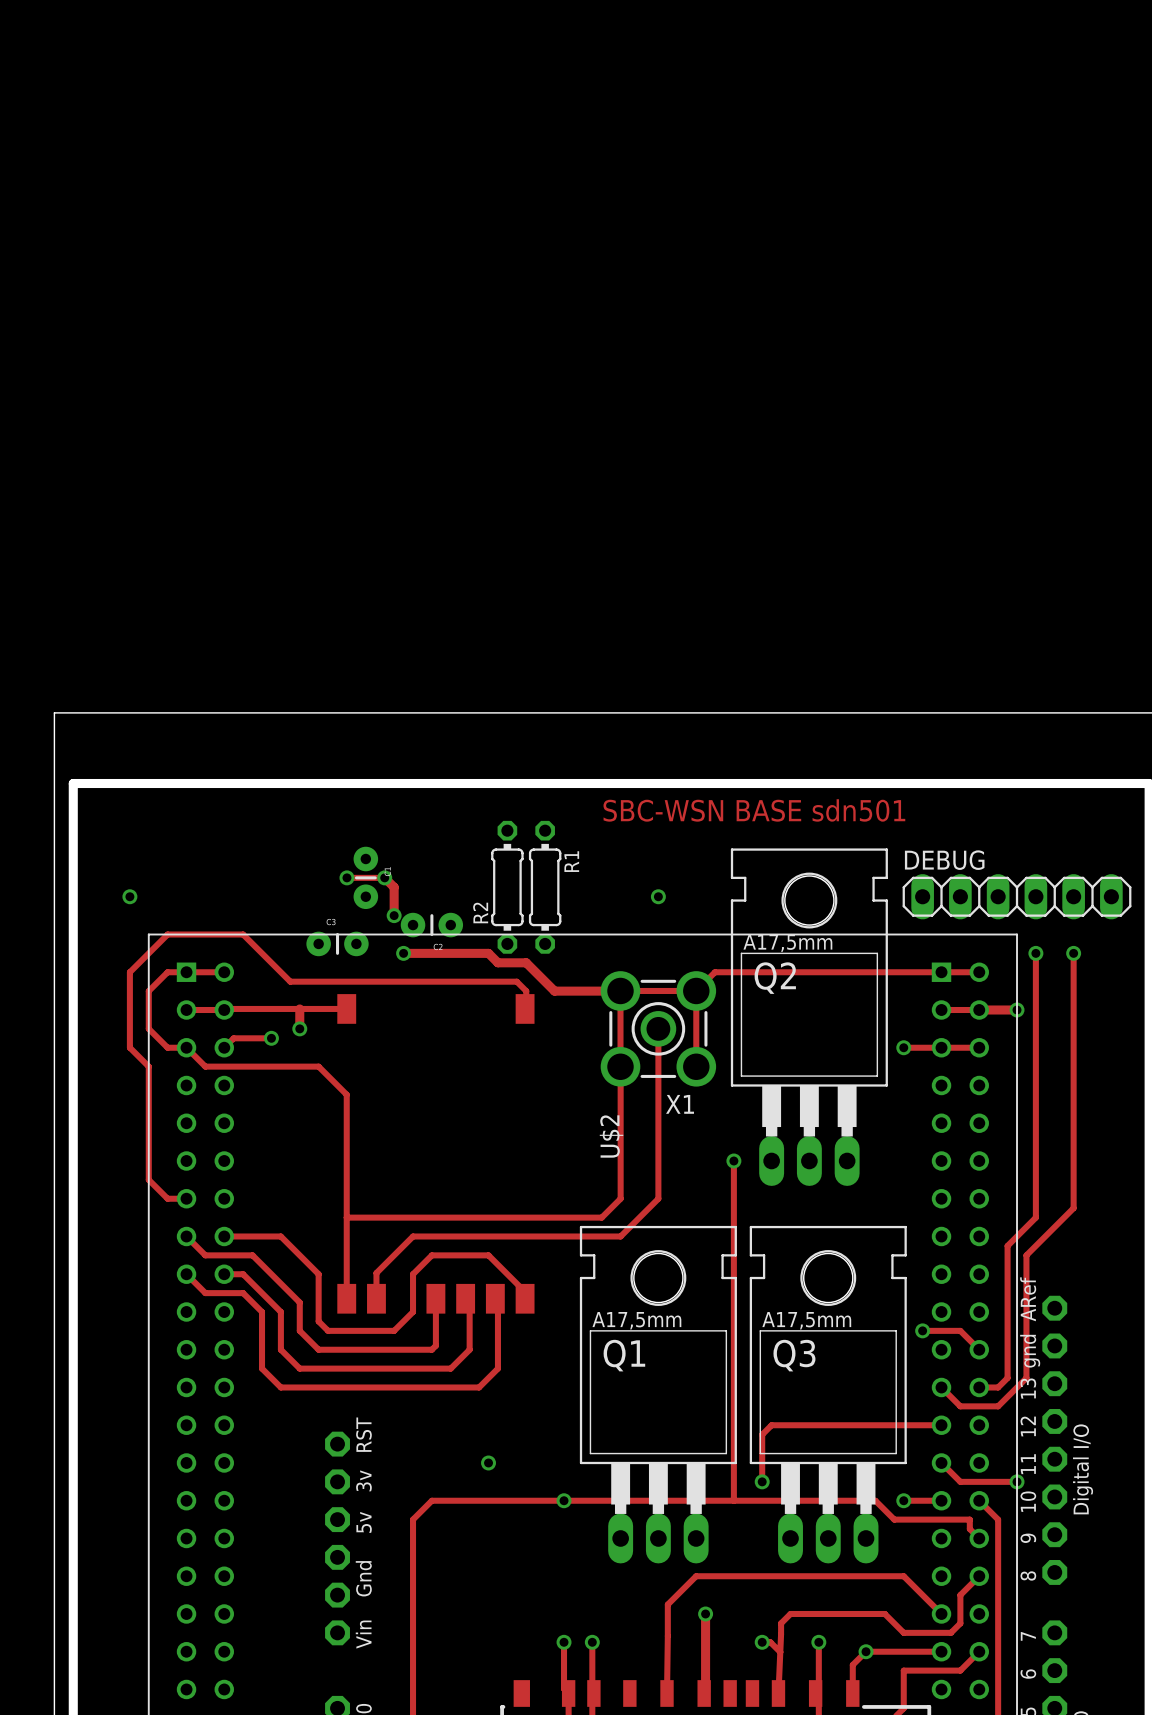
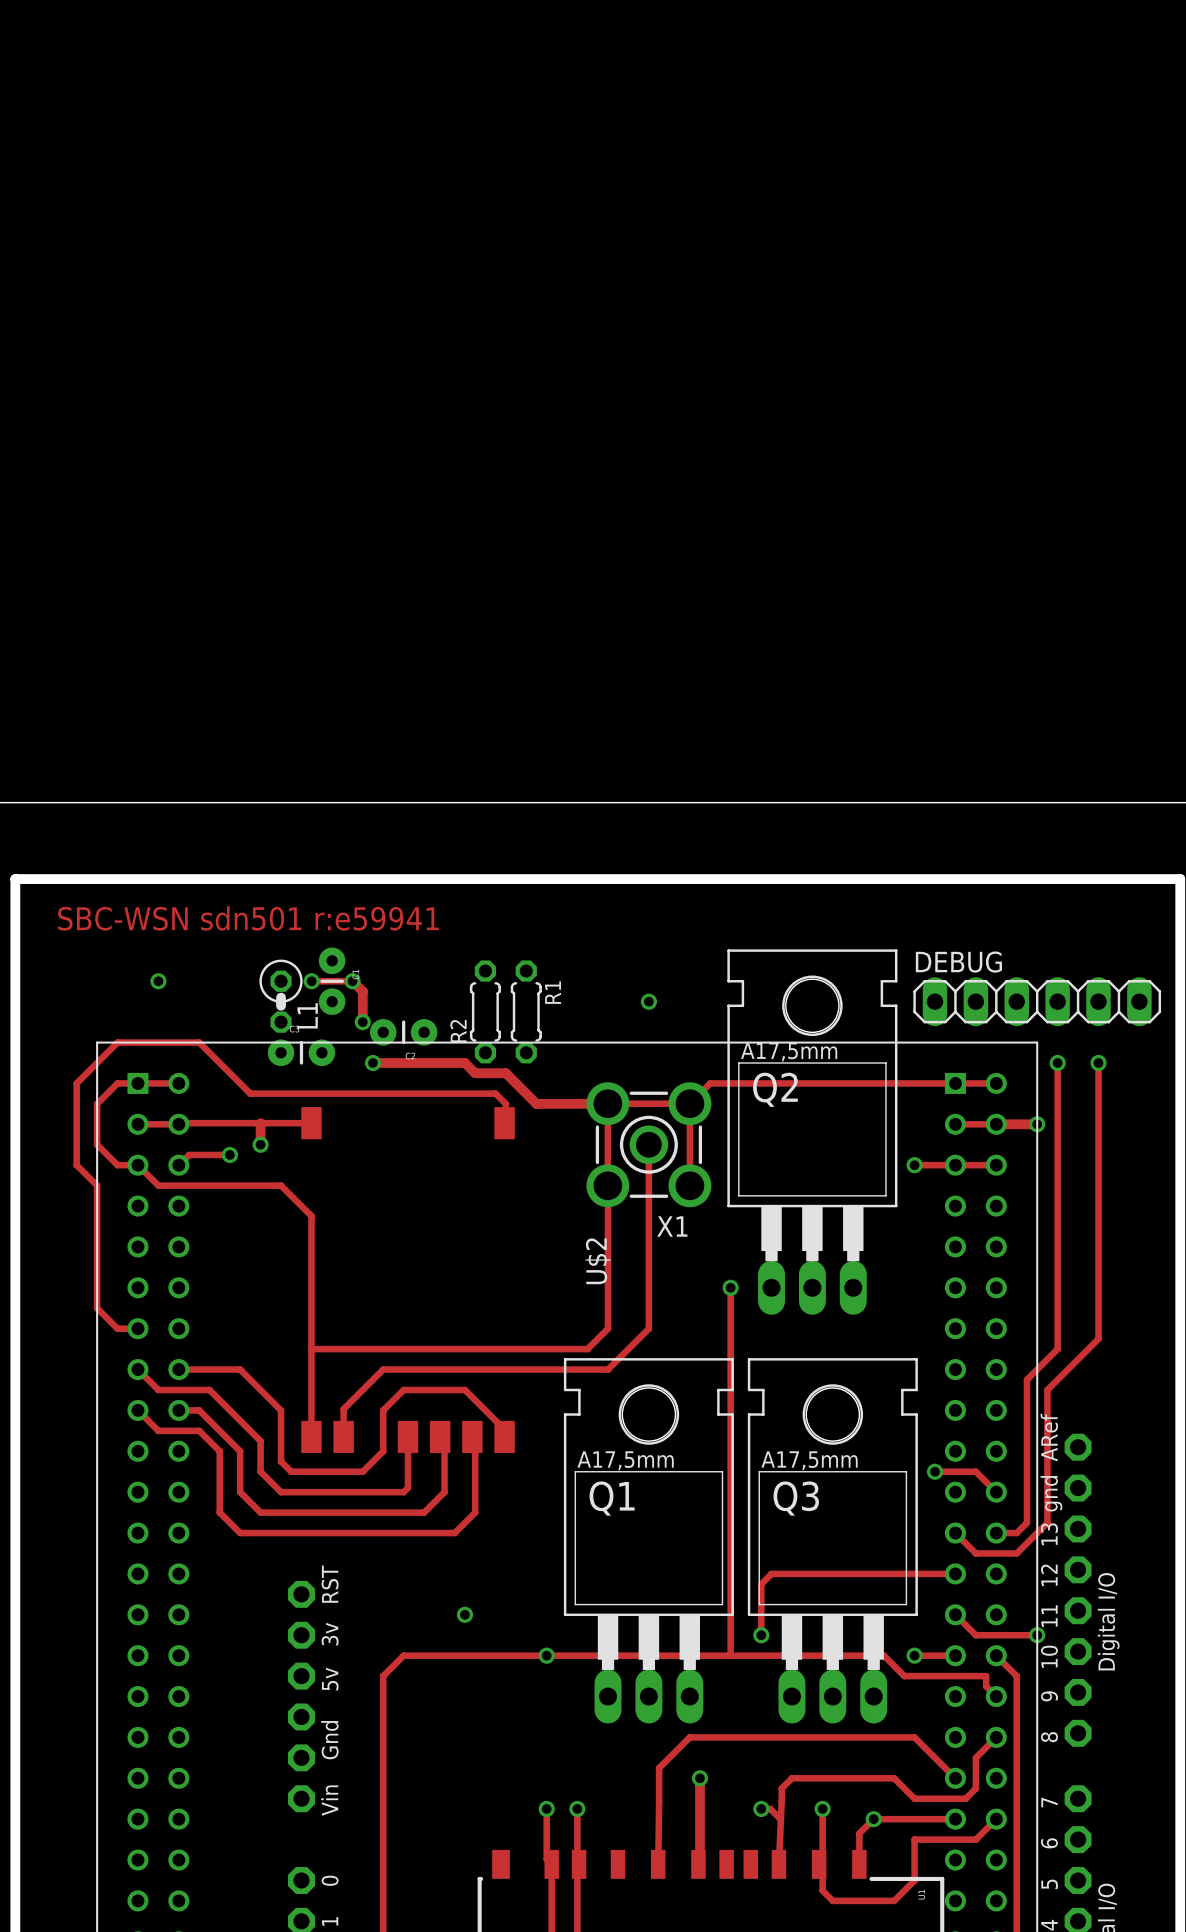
text: SBC-WSN BASE sdn501 (754, 810) -> none
text: none -> SBC-WSN sdn501 r:e59941 (248, 918)
R2 footprint: [491, 820, 524, 954] -> [469, 960, 501, 1064]
R1 footprint: [528, 820, 562, 954] -> [510, 960, 542, 1064]
L1: none -> (281, 996)
via position: (129, 896) -> (158, 981)

